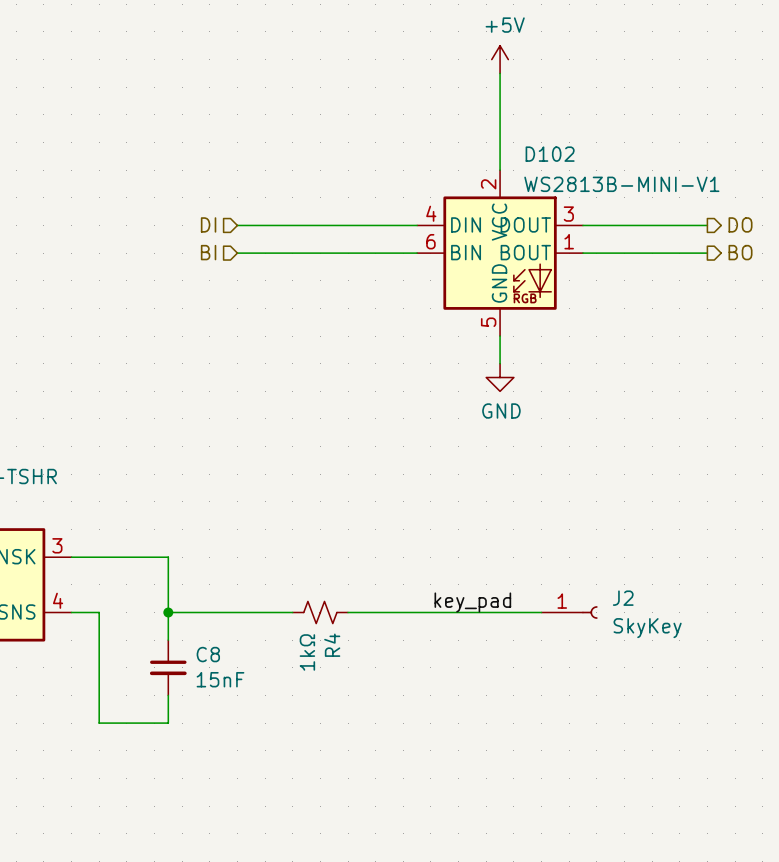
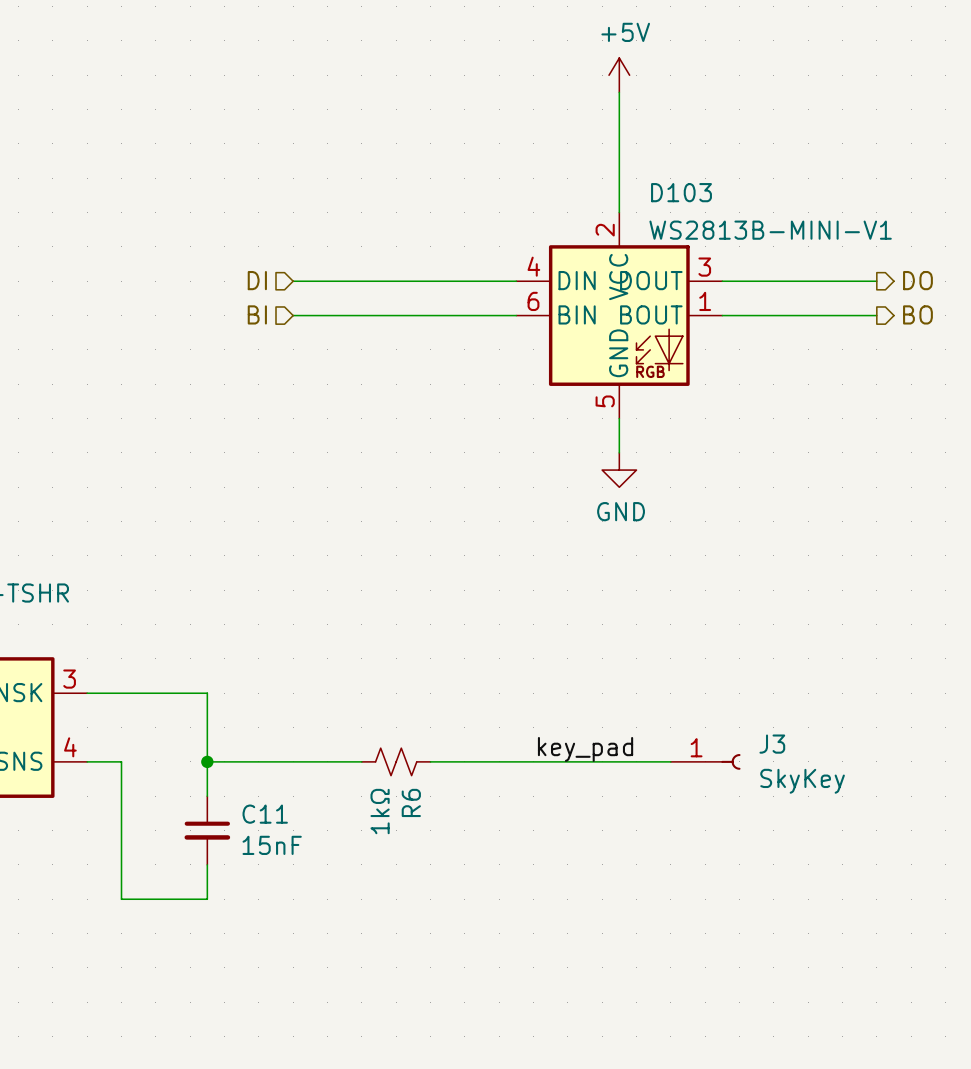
D102 name: D102 (550, 154) -> D103 (681, 192)
J2 name: J2 (623, 598) -> J3 (772, 744)
R4 name: R4 (332, 645) -> R6 (411, 802)
C8 name: C8 (208, 654) -> C11 (265, 814)

